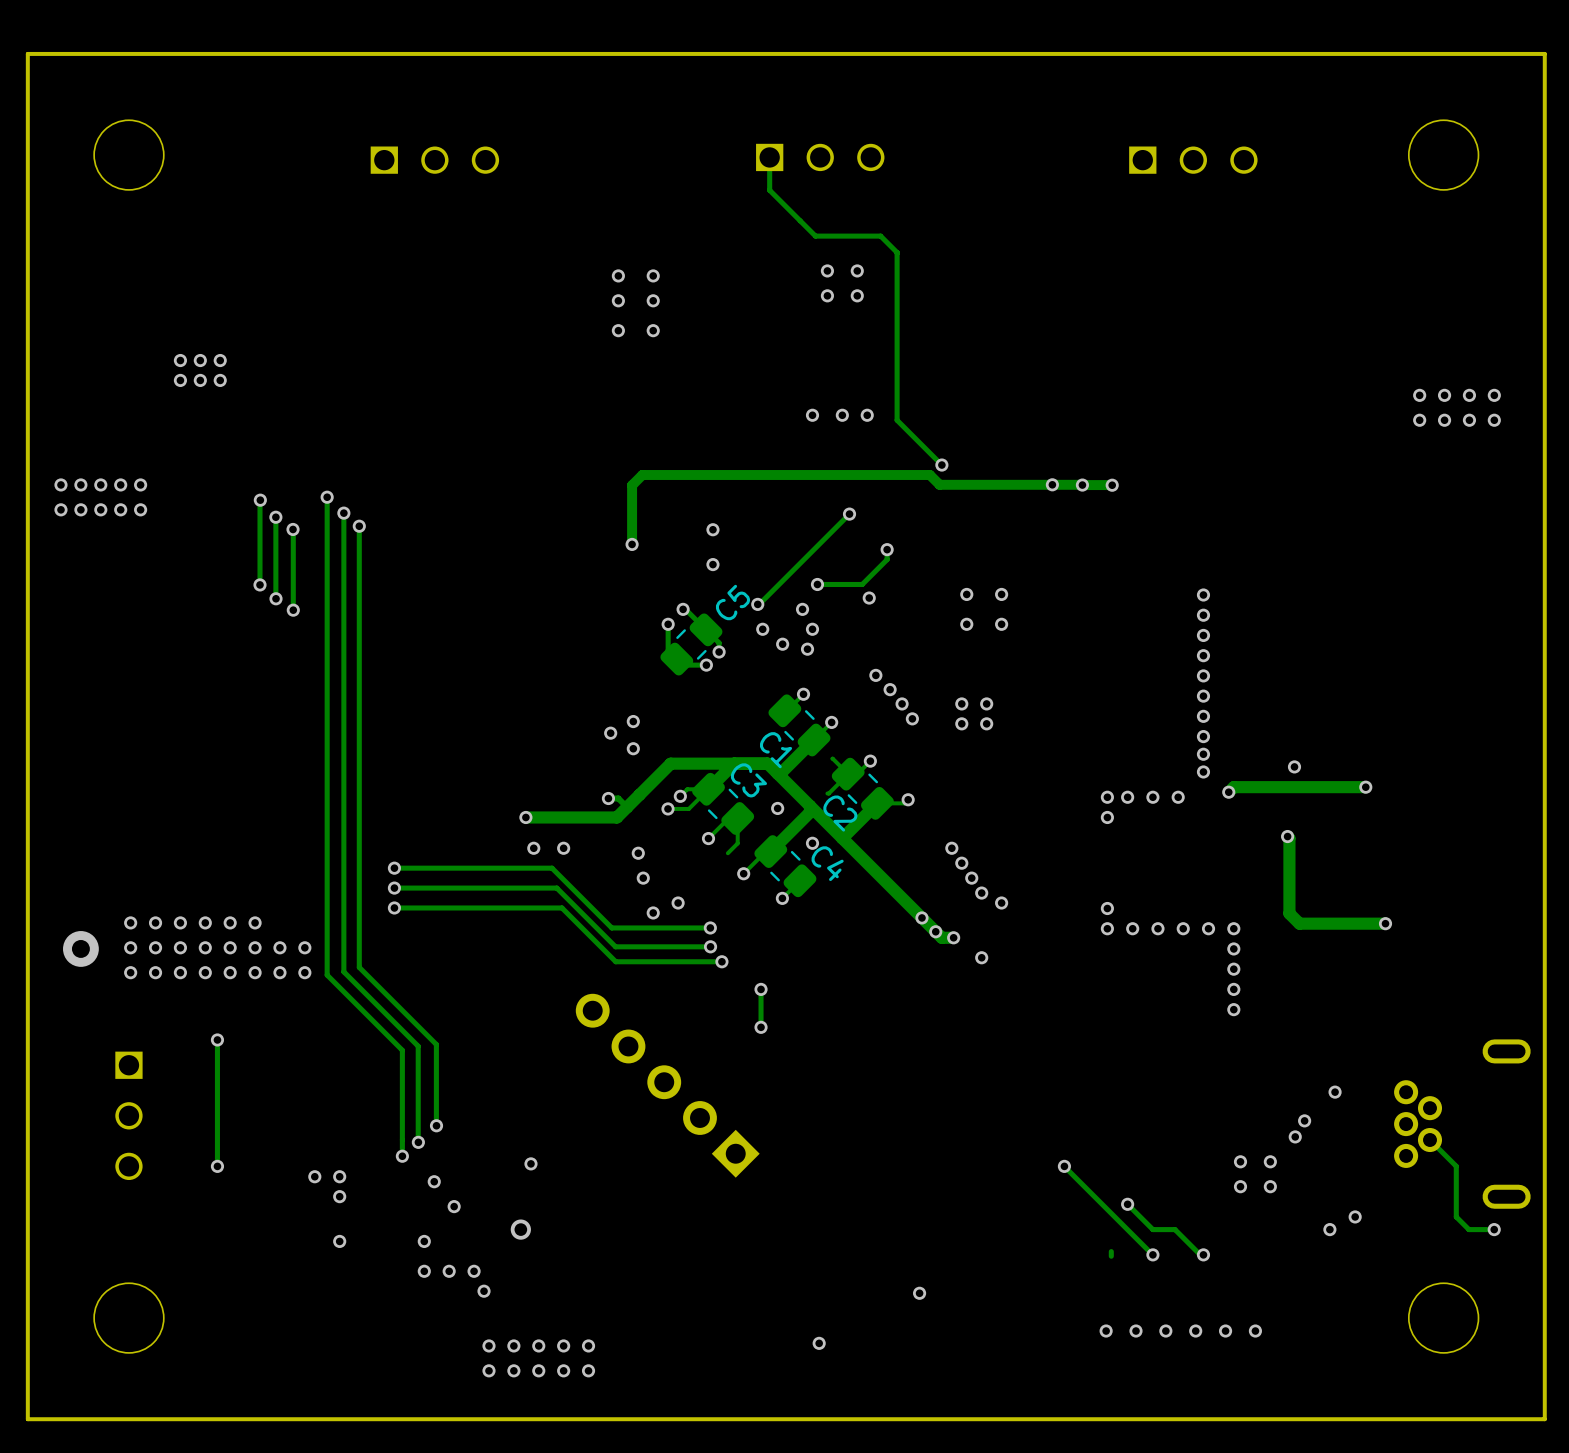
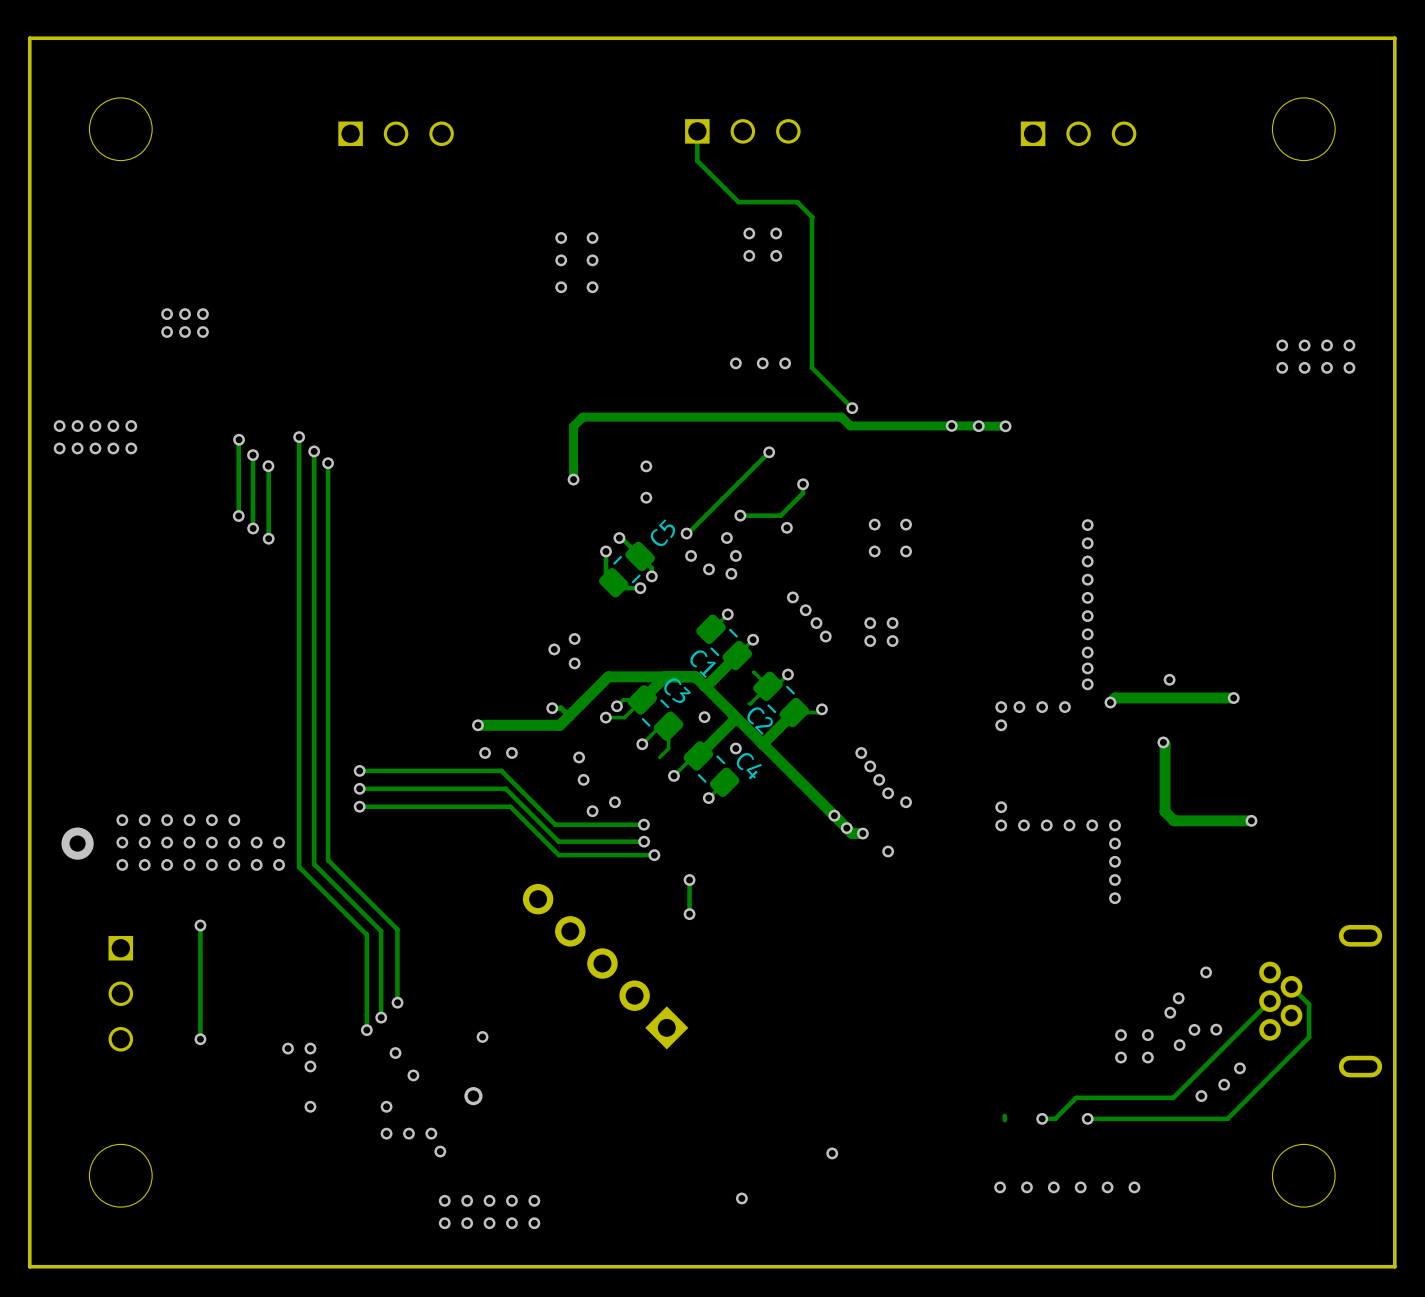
track: none -> (1291, 986) (1309, 1004) (1309, 1037) (1227, 1118) (1087, 1118)
track: (1429, 1140) (1456, 1166) (1456, 1216) (1468, 1229) (1494, 1229) -> none
via: none -> (1194, 1029)
via: none -> (1216, 1029)
track: (1064, 1166) (1152, 1254) -> (1270, 1001) (1173, 1097) (1076, 1097) (1055, 1118) (1042, 1118)
via: (1064, 1166) -> none
via: none -> (1179, 1045)
via: none -> (1239, 1068)
track: (1127, 1204) (1152, 1229) (1175, 1229) (1200, 1254) -> none
via: (1127, 1204) -> none
via: (1494, 1229) -> none

